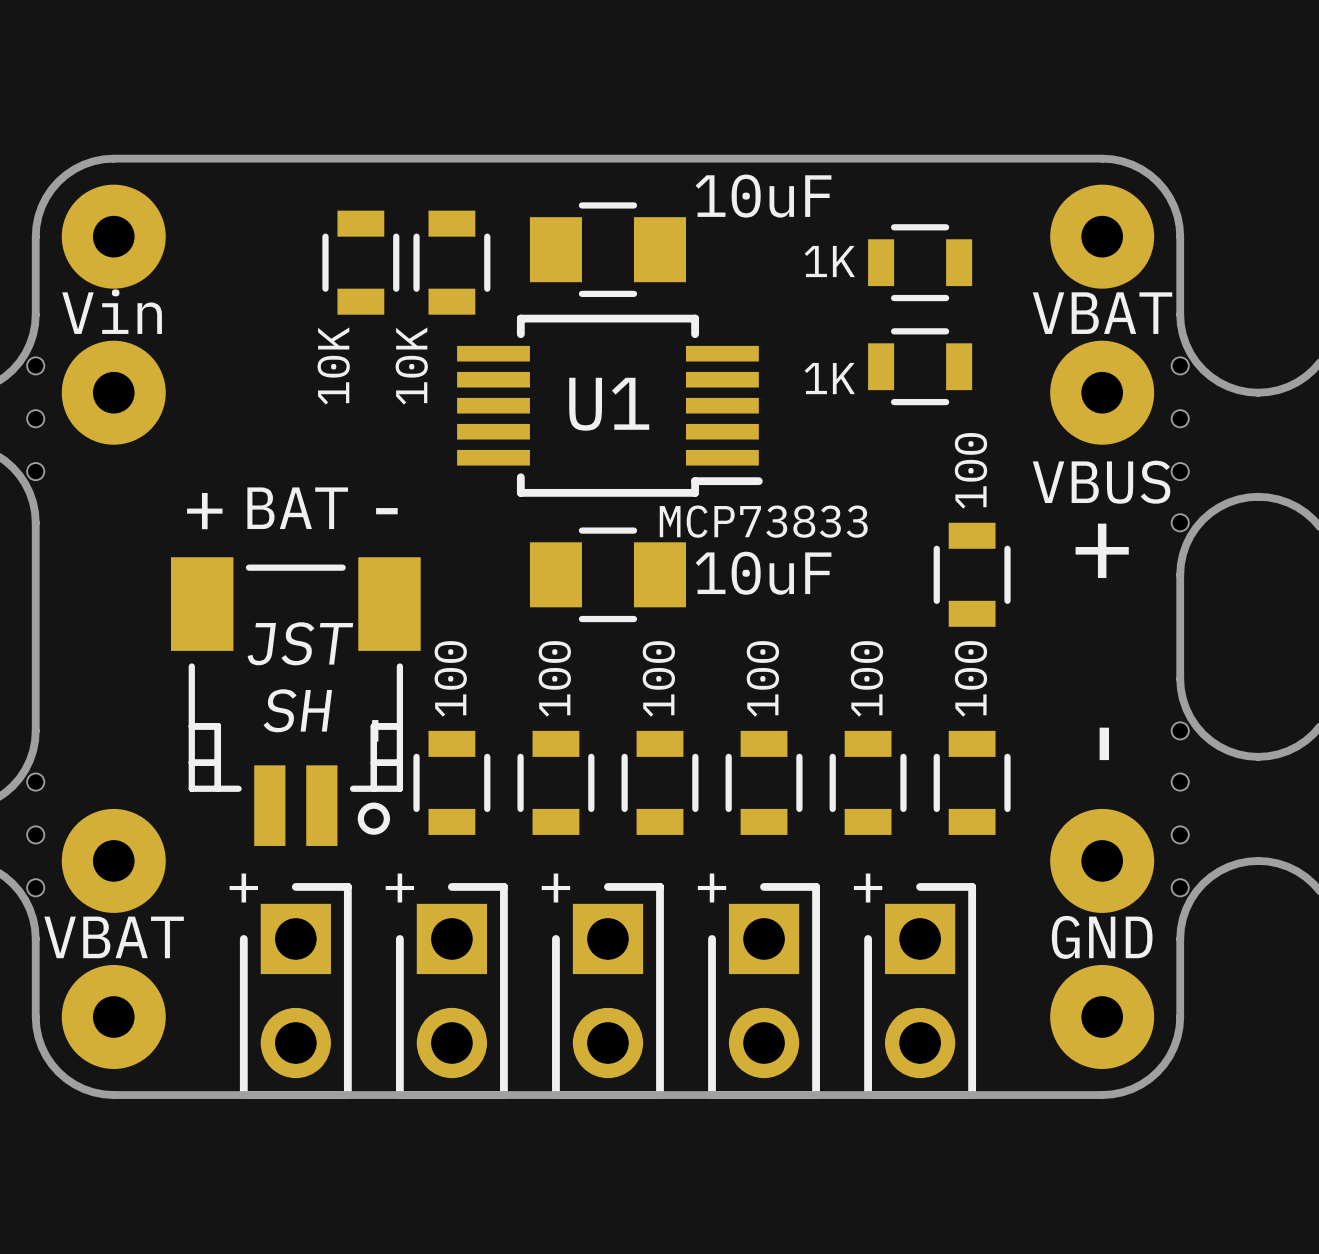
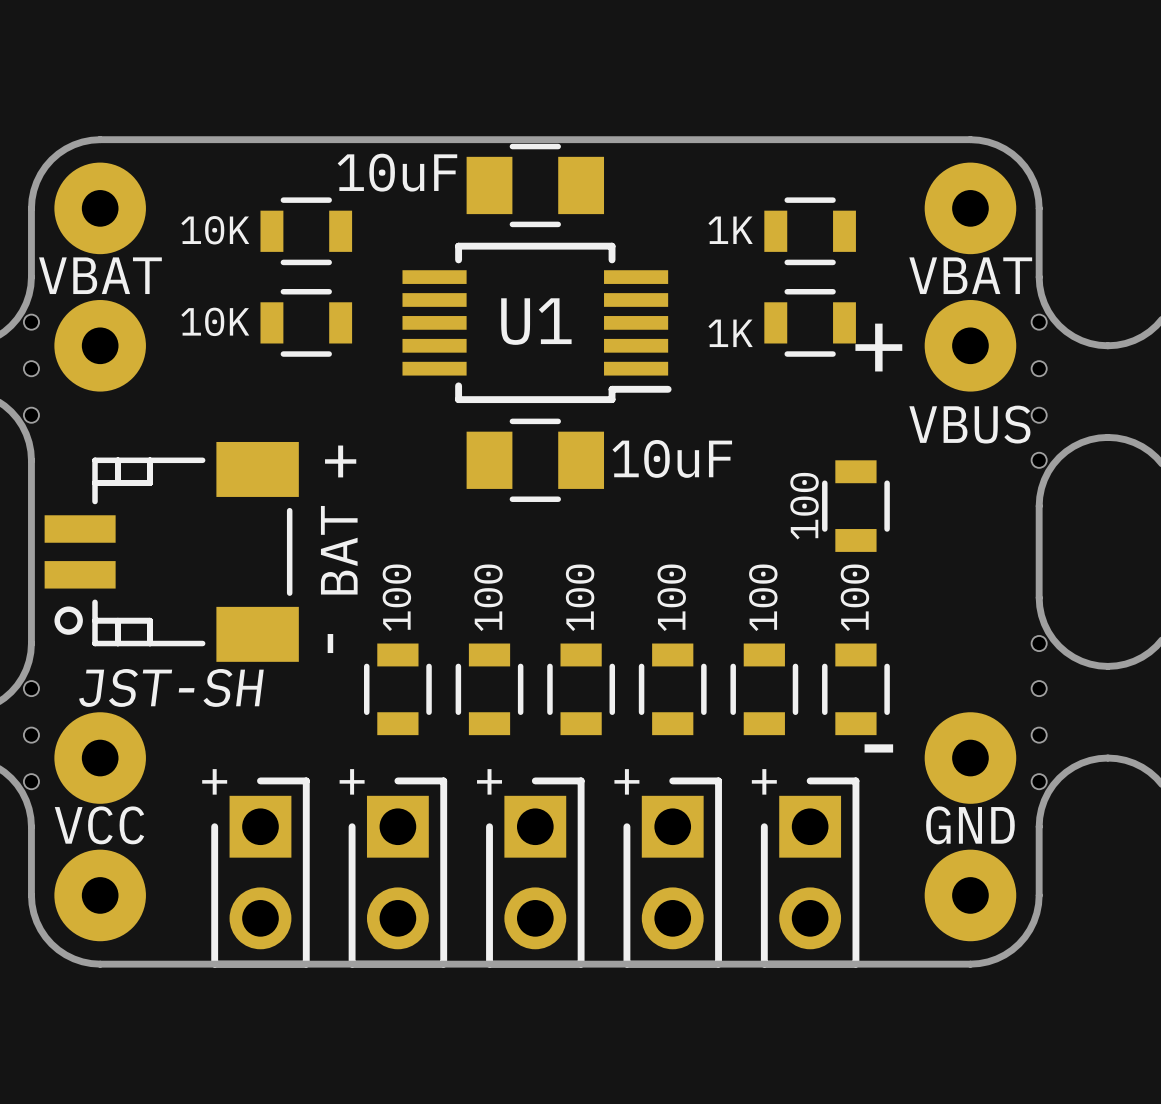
part value position: 10uF (763, 196) -> 10uF (397, 172)
part position: (607, 249) -> (535, 185)
part rotation: 0° (360, 262) -> 90° clockwise (306, 231)
part rotation: 0° (451, 262) -> 90° clockwise (306, 322)
part position: (451, 262) -> (306, 322)
text: Vin (112, 311) -> VBAT (100, 275)
U1 position: (609, 405) -> (537, 322)
part value position: 100 (970, 470) -> 100 (804, 506)
text position: + (204, 511) -> + (340, 461)
text: - (386, 511) -> none
U1 value: MCP73833 (763, 521) -> none
text position: + (1102, 550) -> + (878, 347)
part position: (607, 574) -> (535, 460)
text: JST (300, 643) -> none
part rotation: 0° (295, 701) -> 90° clockwise (171, 551)
text: SH (297, 710) -> none
text rotation: 0° (1104, 743) -> 90° clockwise (878, 748)
text: none -> JST-SH (171, 687)
text: VBAT (114, 937) -> VCC (99, 825)

